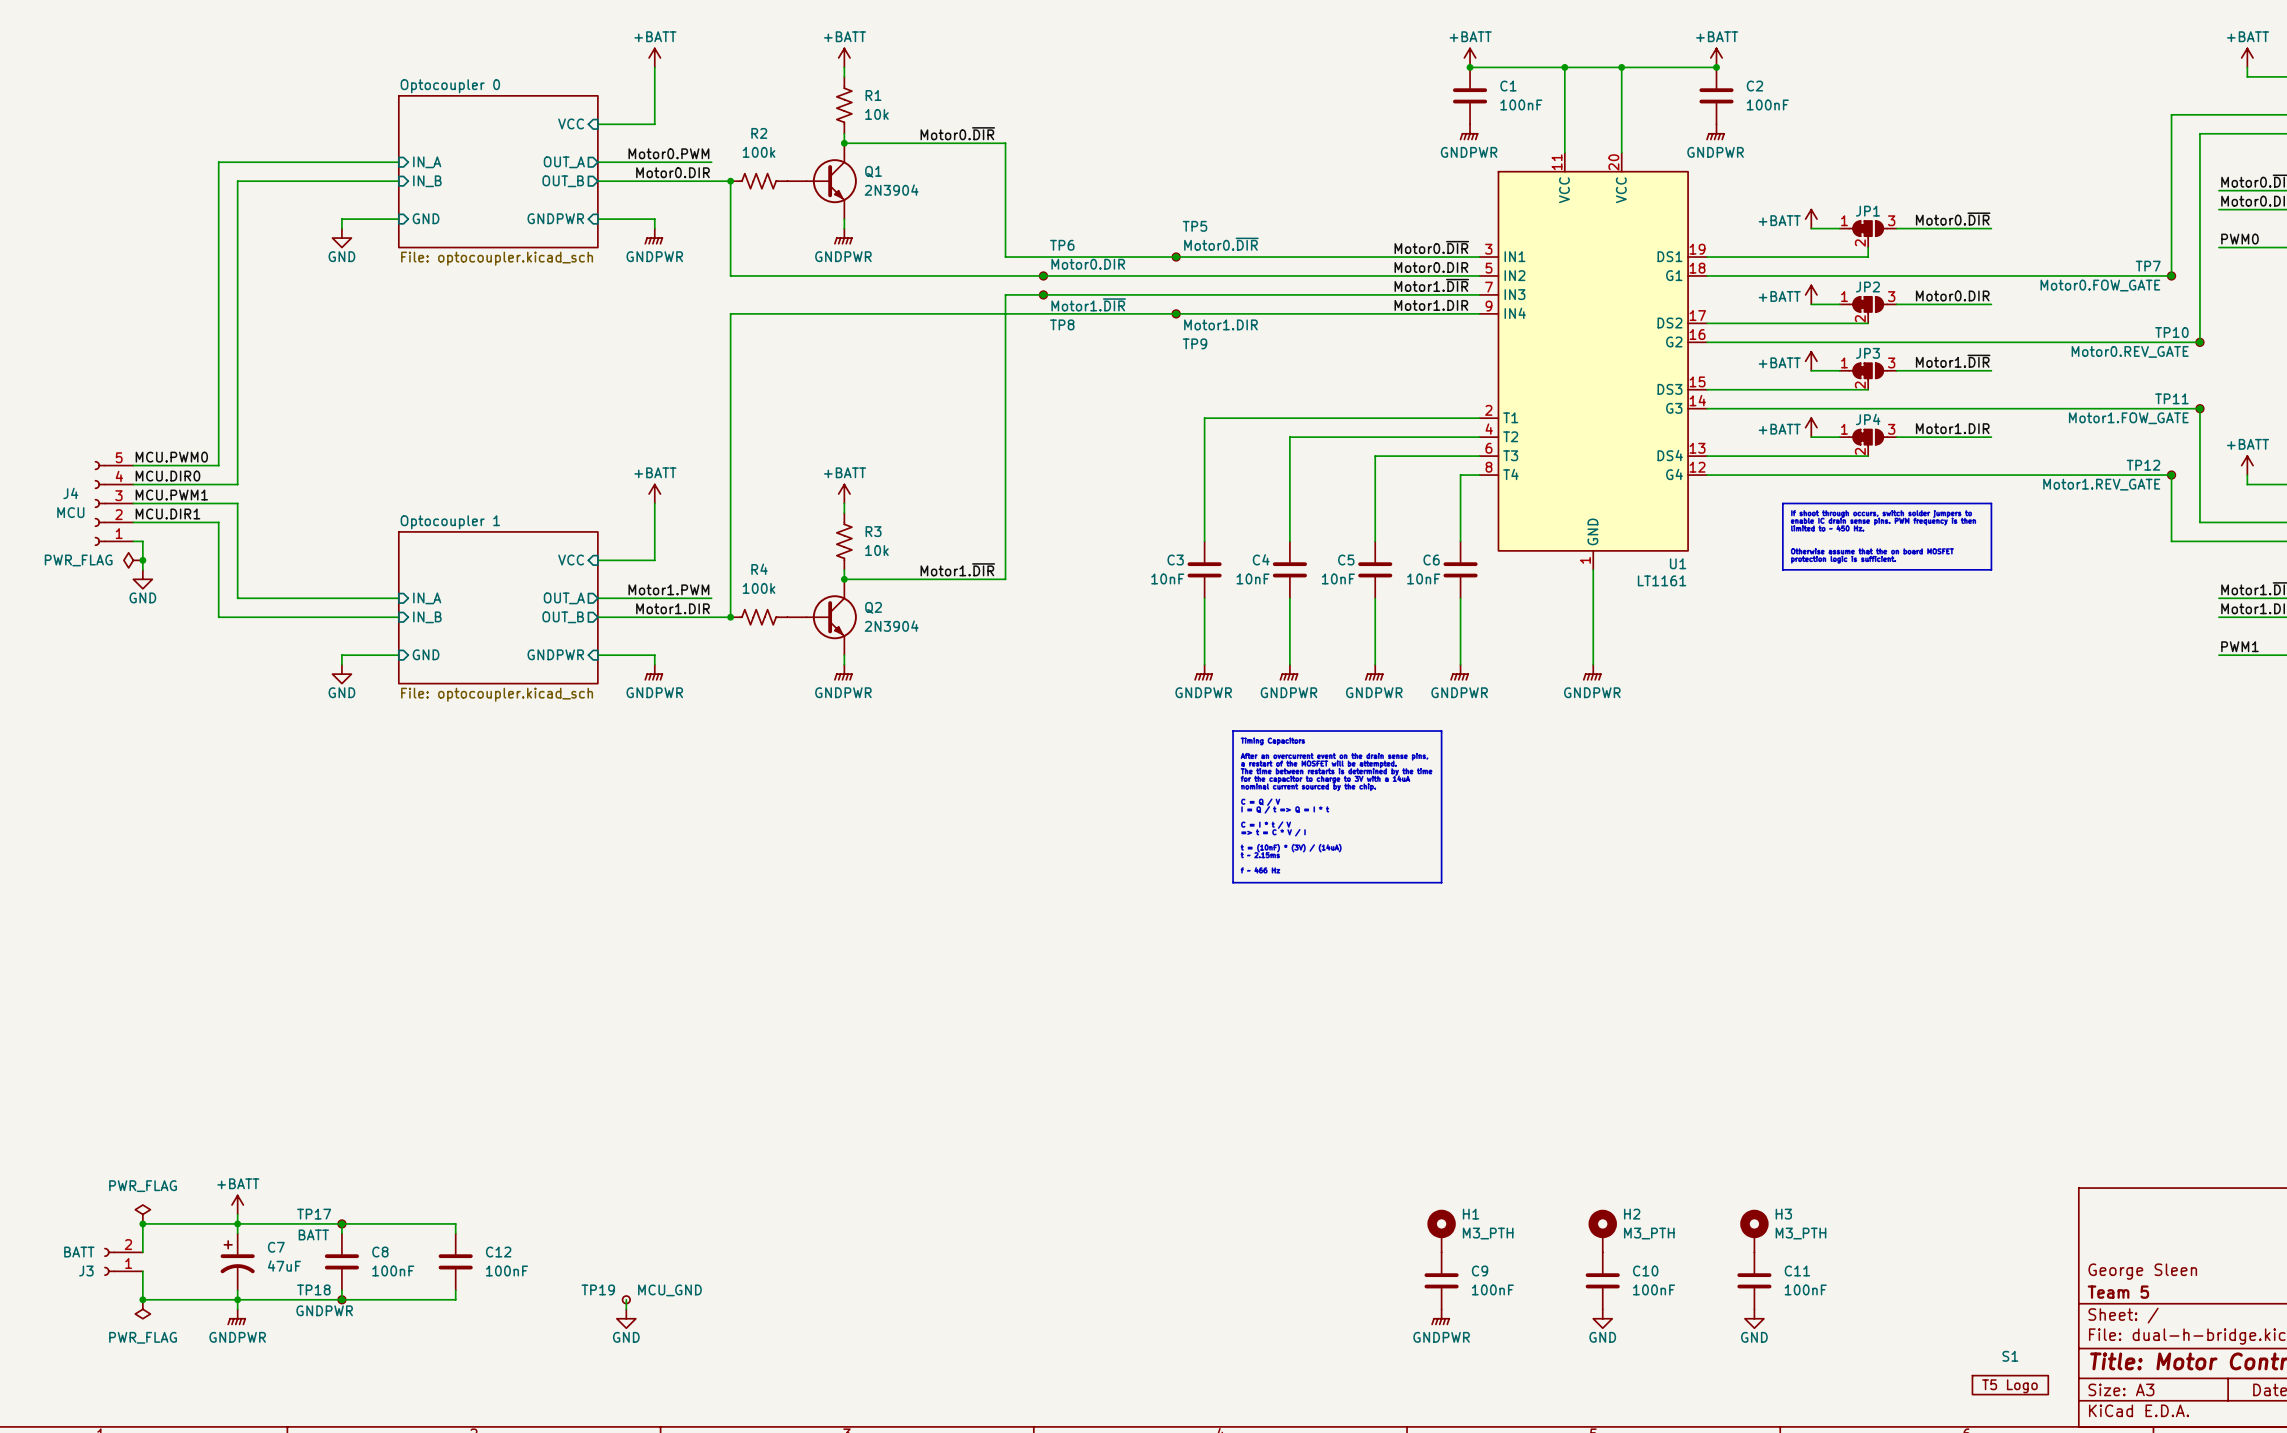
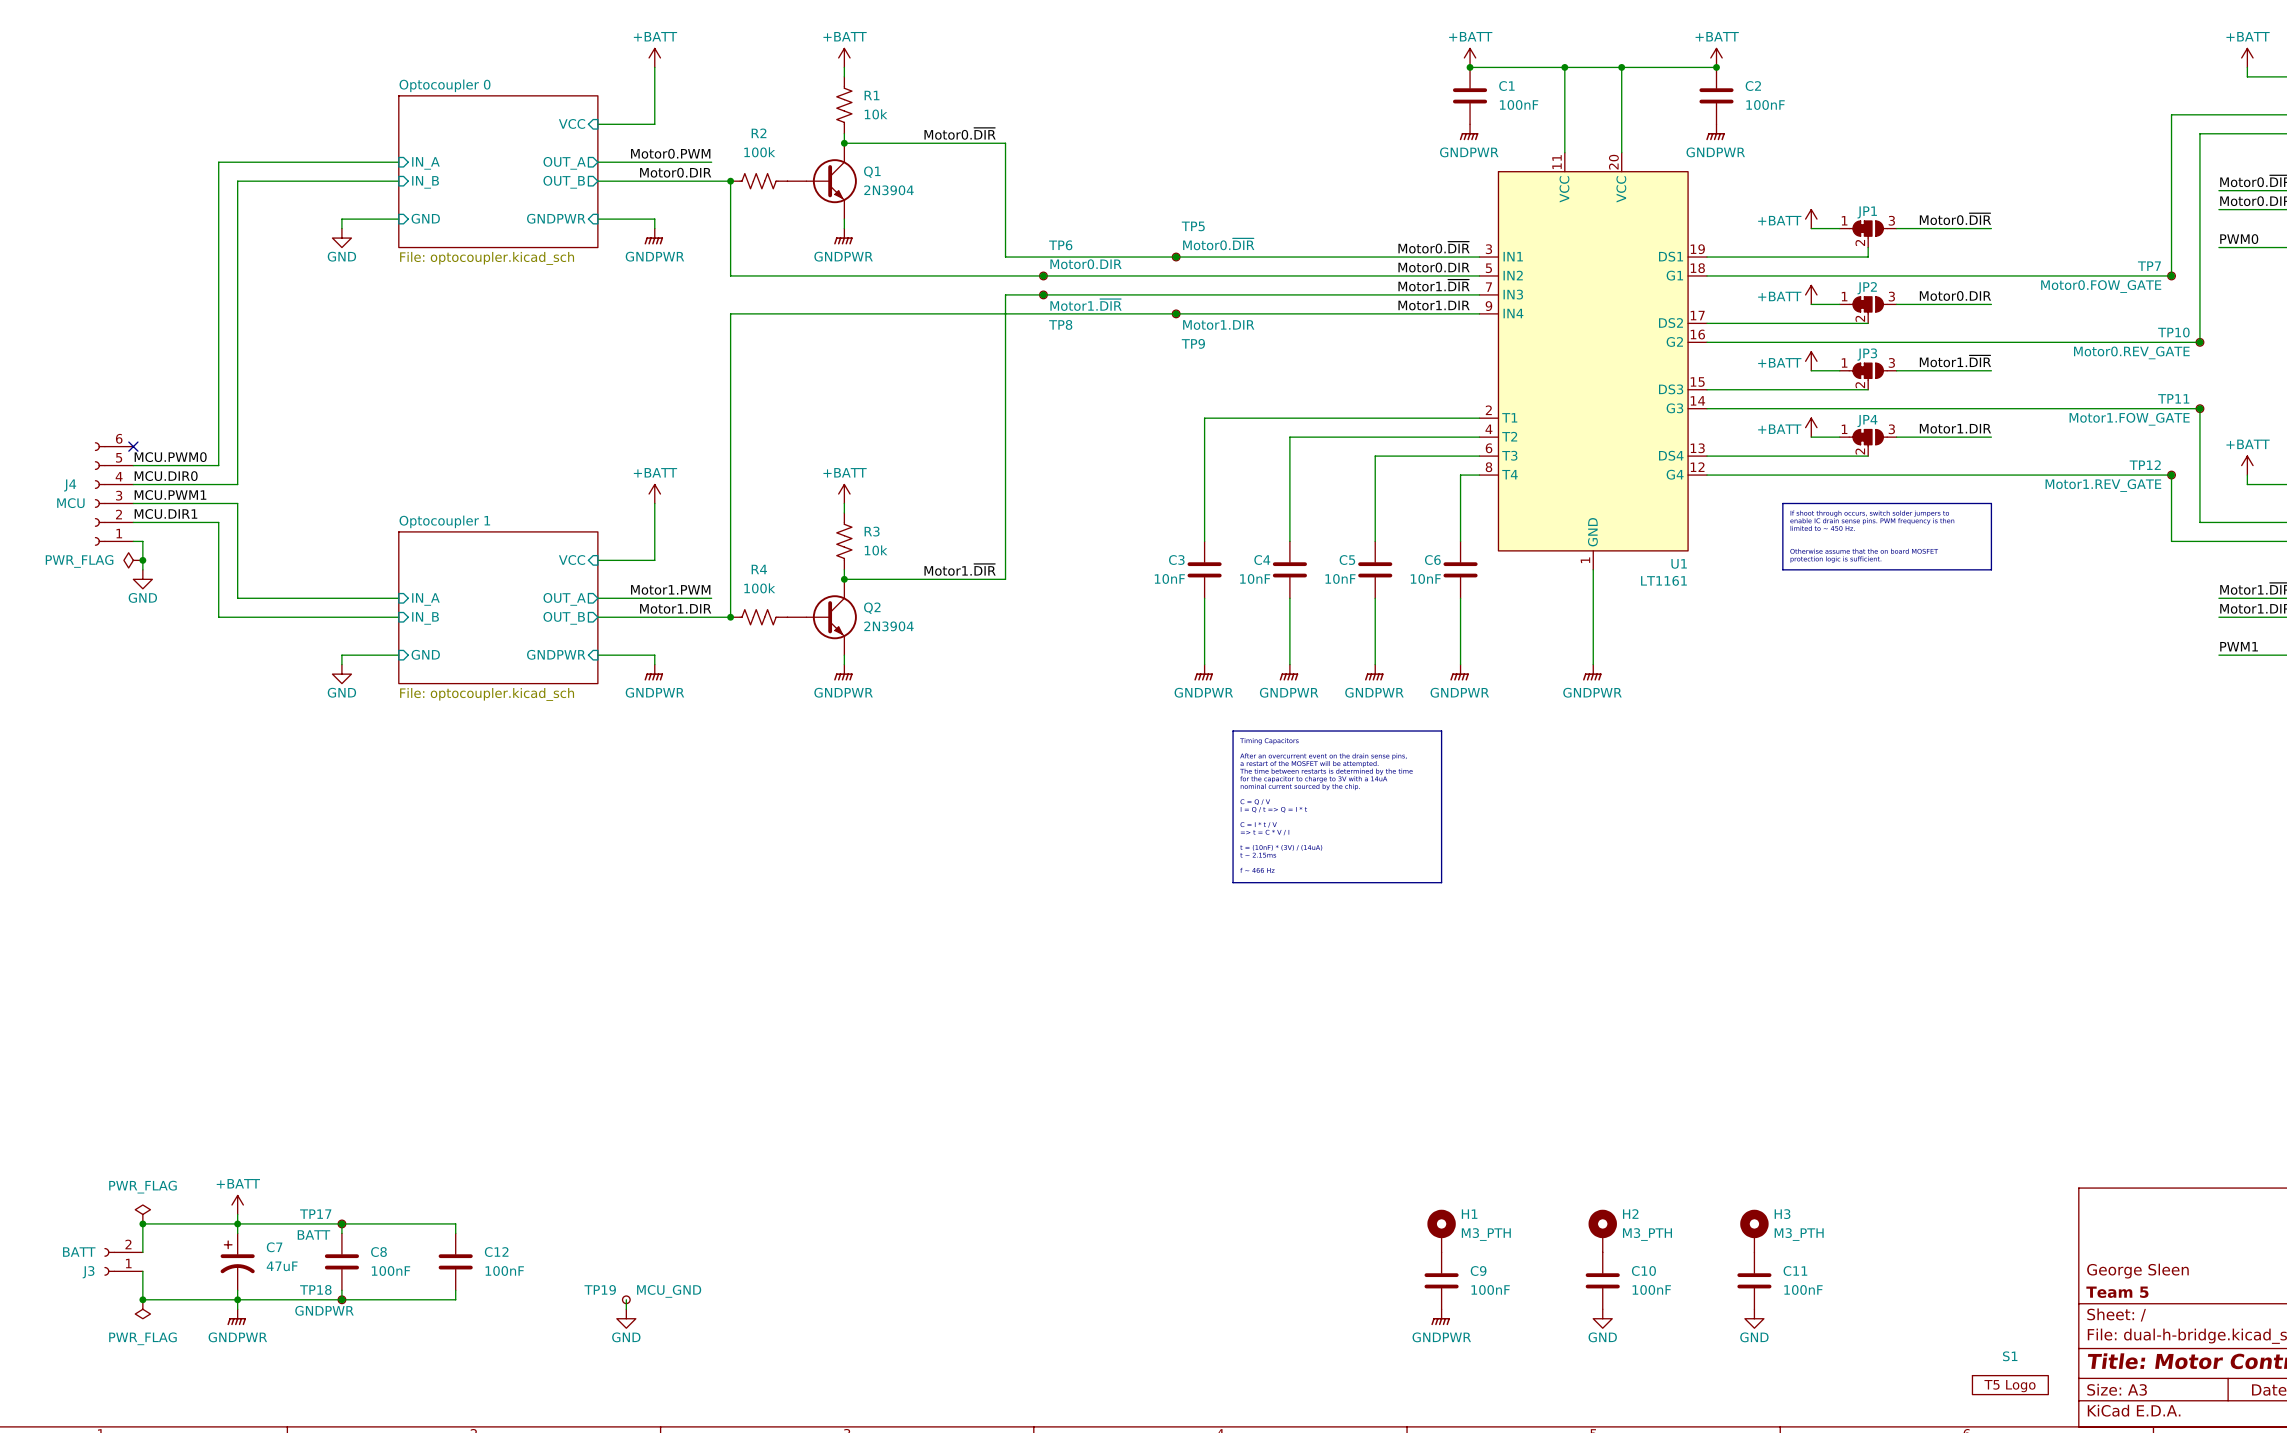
no-connect mark: none -> (133, 446)
J4 symbol: [94, 461, 134, 546] -> [94, 442, 134, 546]

